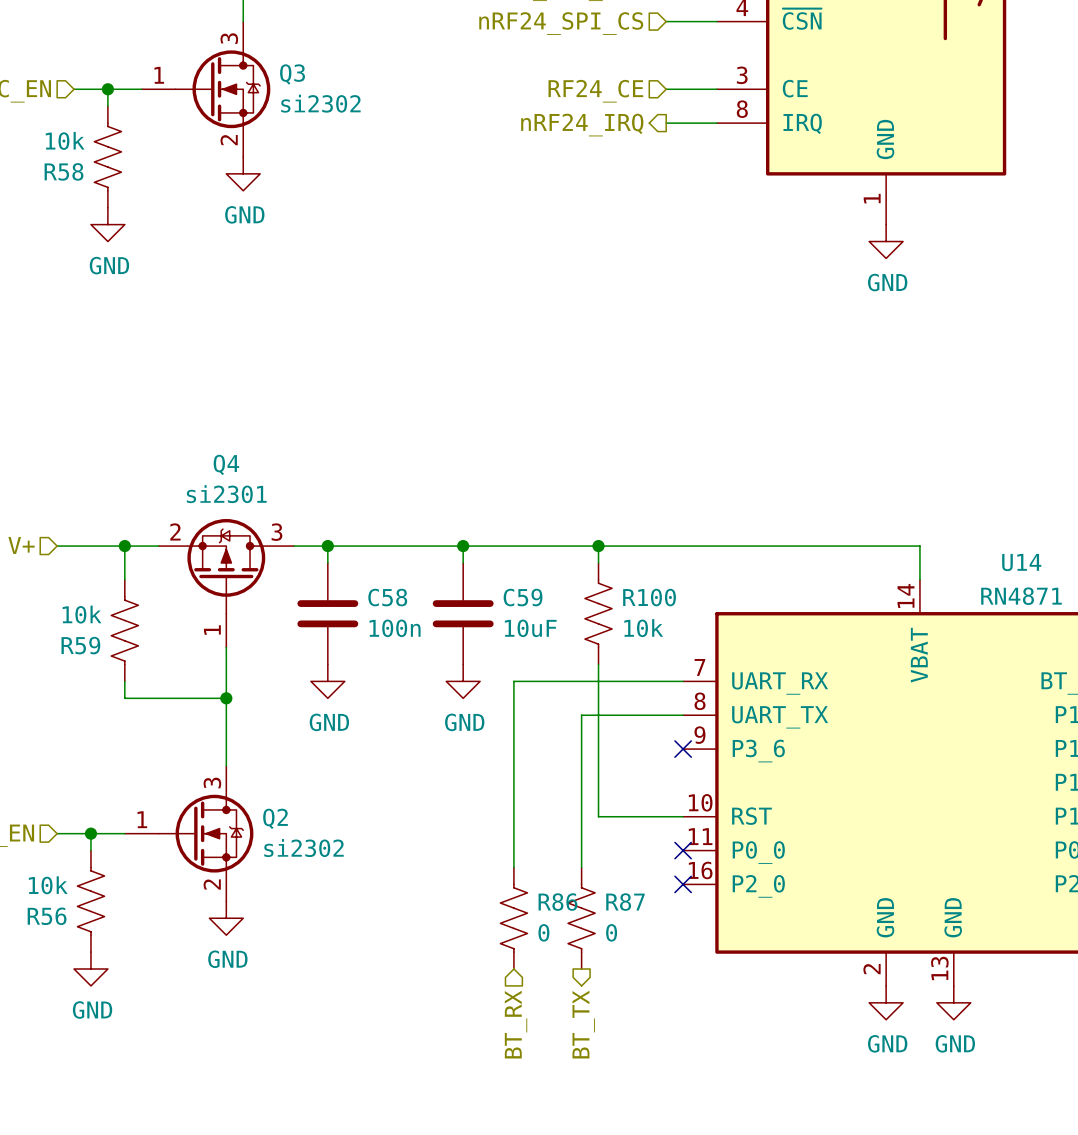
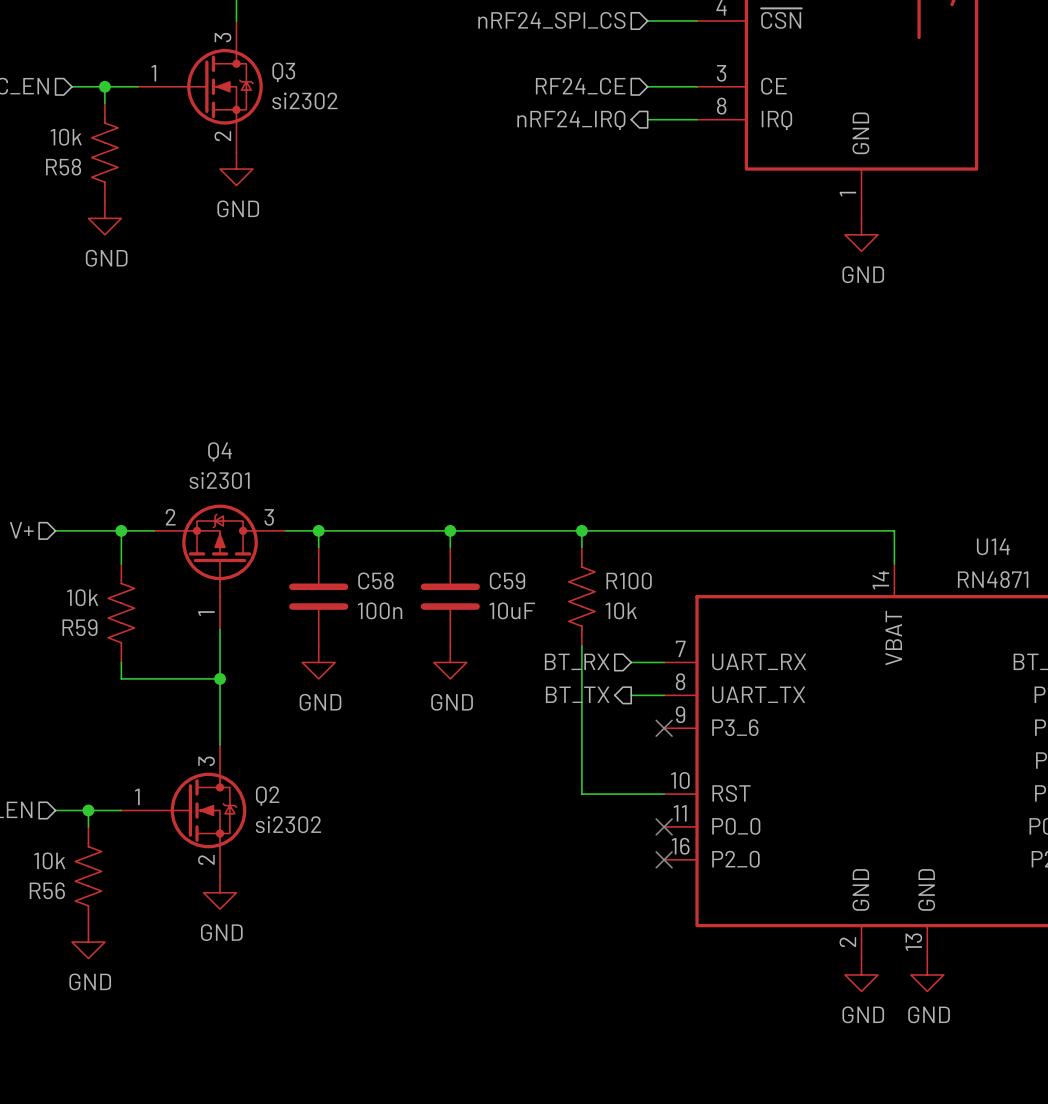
wire: (649, 681) (513, 681) (513, 867) -> none
wire: (649, 715) (581, 715) (581, 867) -> none
R86: 0 (513, 918) -> none
R87: 0 (581, 918) -> none
hierarchical label rotation: 0° (516, 1024) -> 90° clockwise (577, 661)
hierarchical label position: BT_RX (516, 1024) -> BT_RX (577, 661)
hierarchical label rotation: 0° (583, 1024) -> 90° clockwise (577, 694)
hierarchical label position: BT_TX (583, 1024) -> BT_TX (577, 694)

